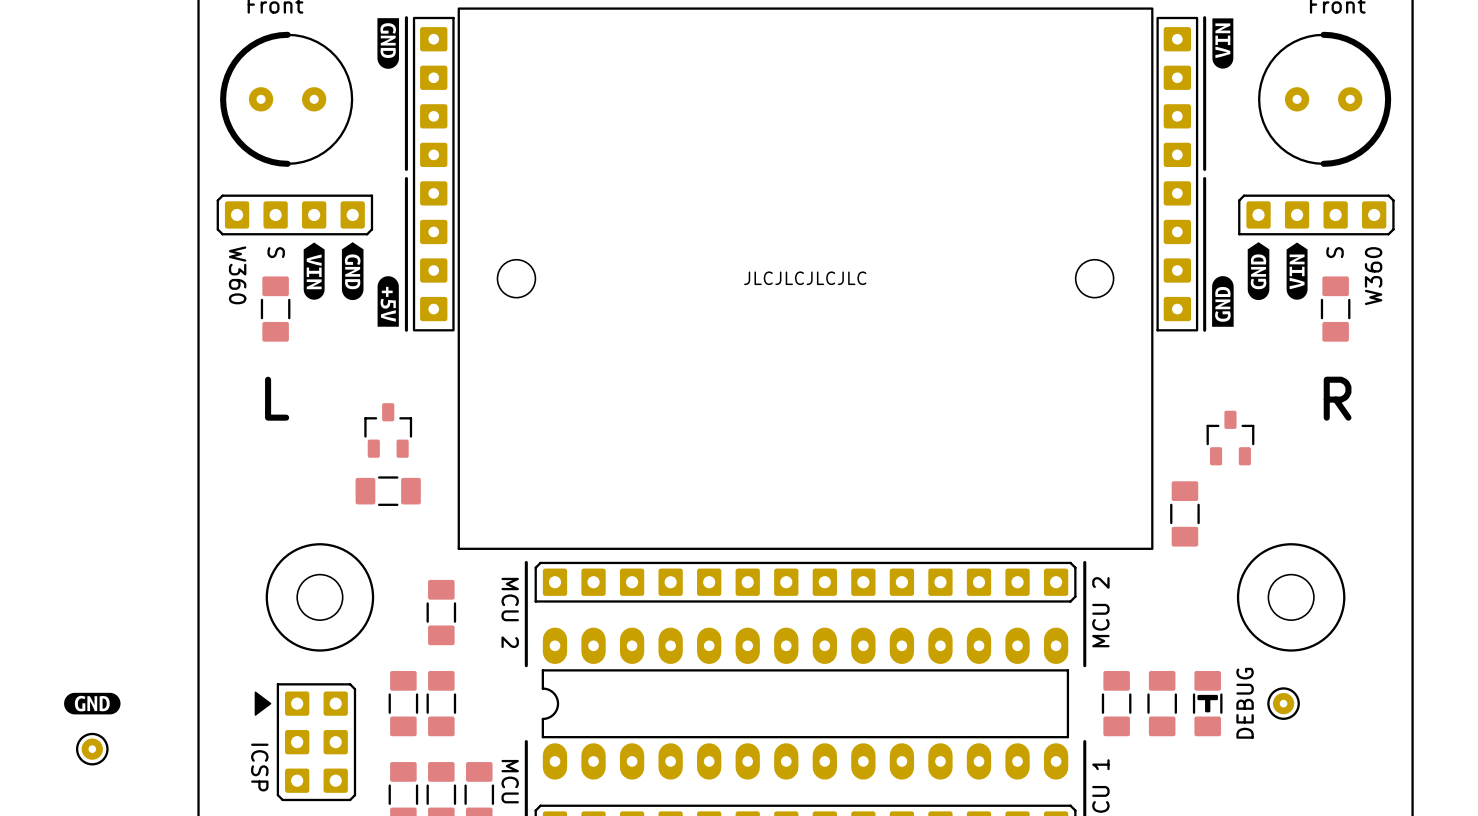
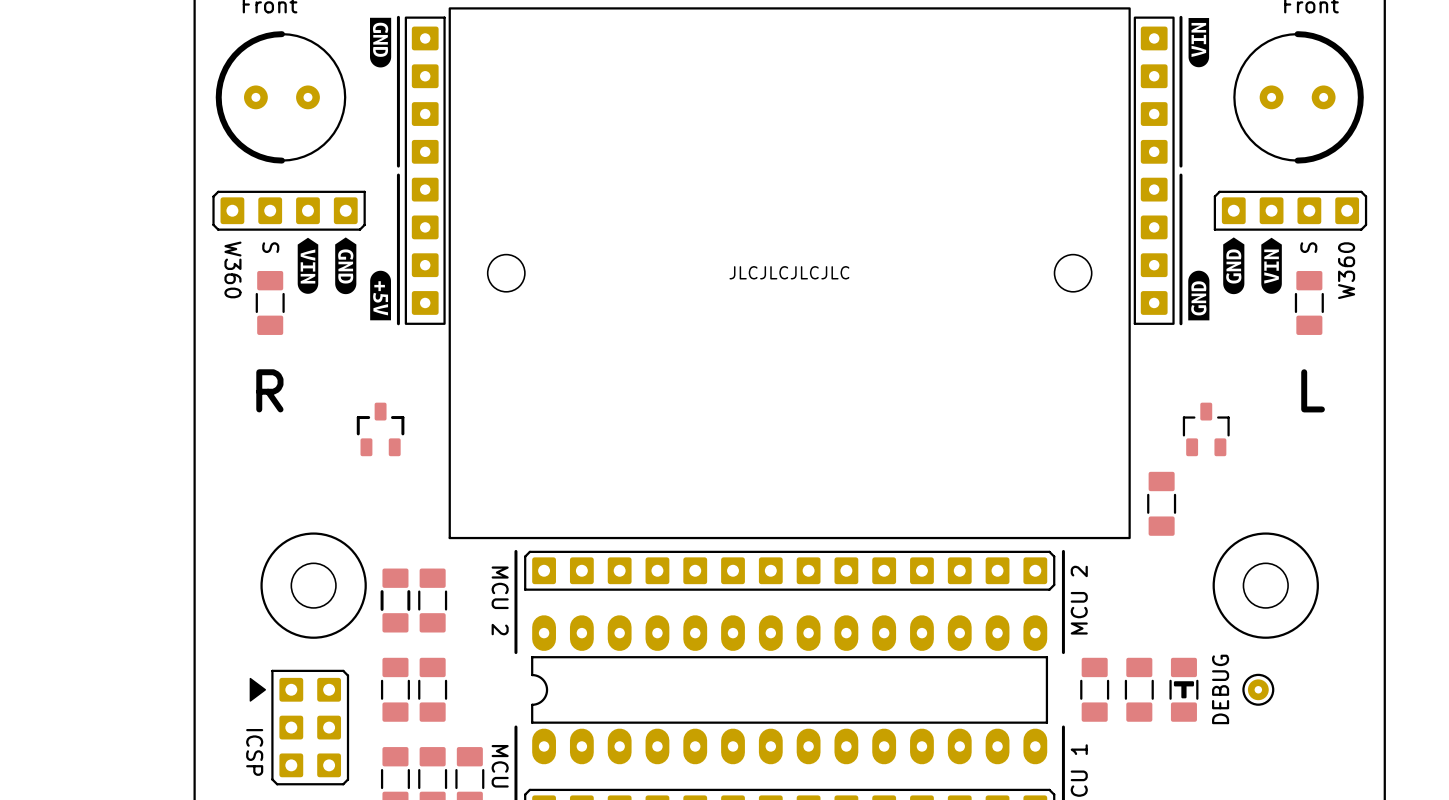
text: L (277, 398) -> R (269, 390)
text: R (1337, 398) -> L (1313, 390)
part footprint: [364, 403, 413, 458] -> [356, 402, 405, 457]
part: (388, 491) -> none
part: none -> (395, 600)
drawing: [64, 692, 121, 715] -> none
part: (92, 749) -> none

